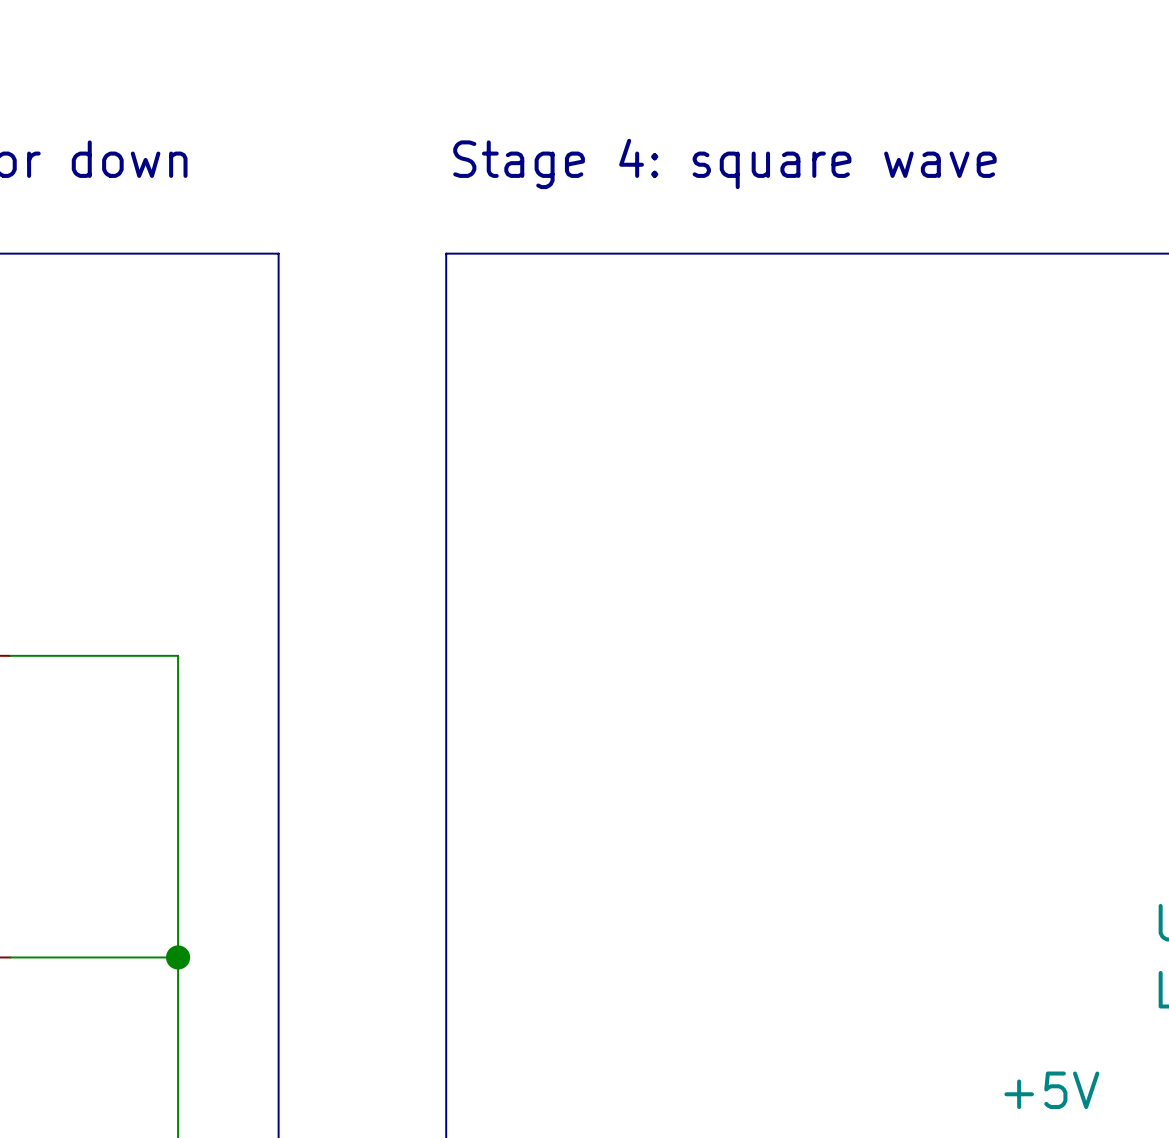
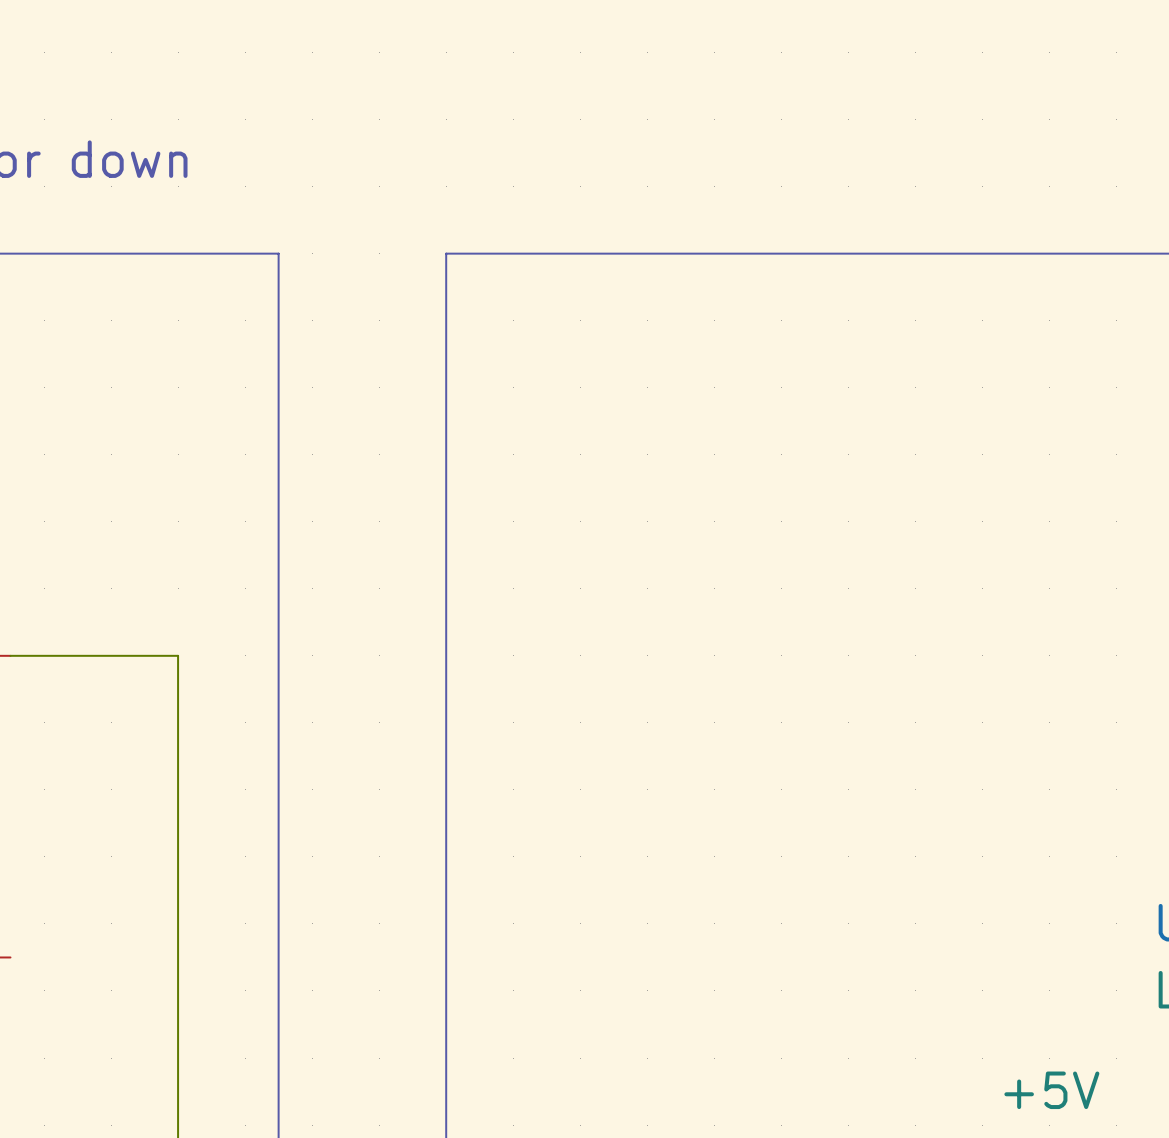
text: Stage 4: square wave (724, 163) -> none
wire: (10, 957) (178, 957) -> none
junction: (178, 957) -> none

